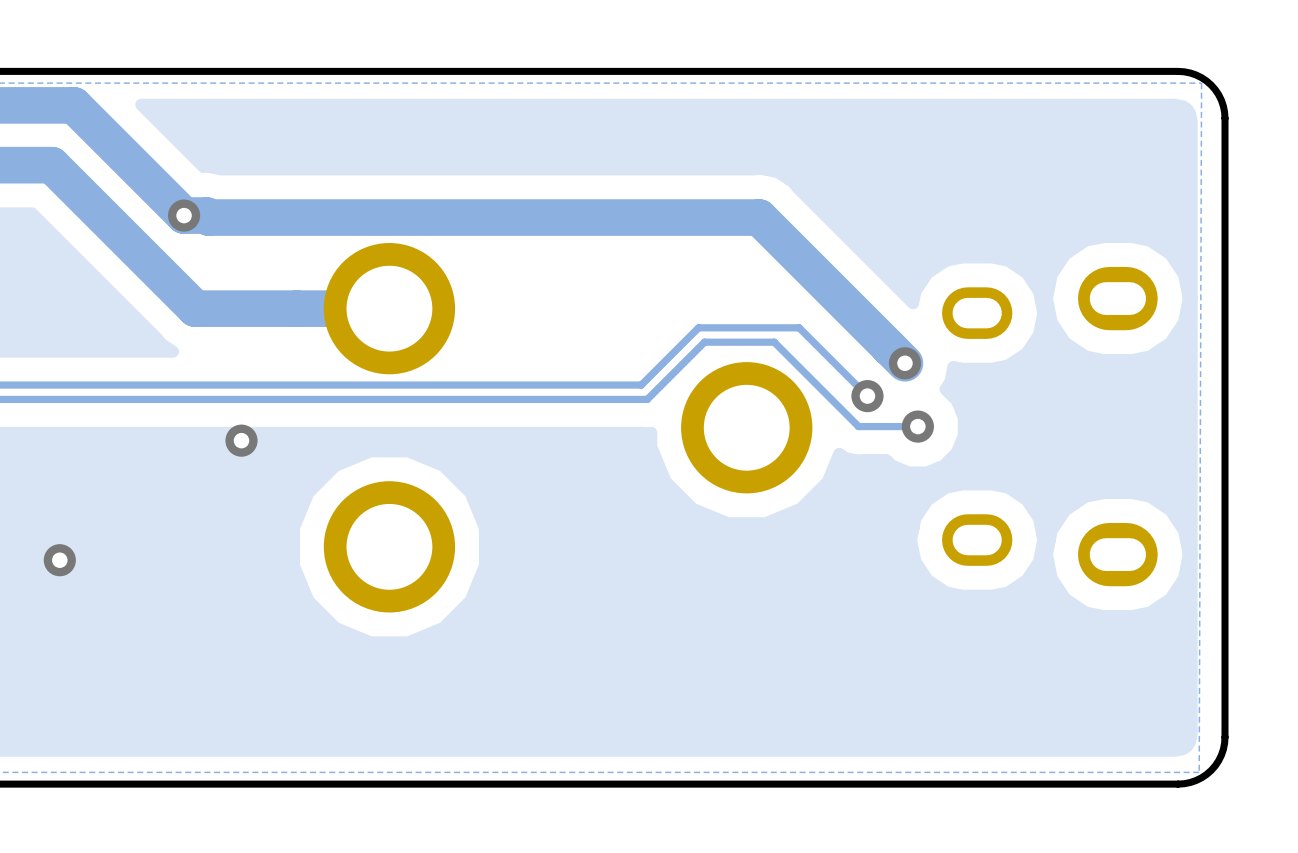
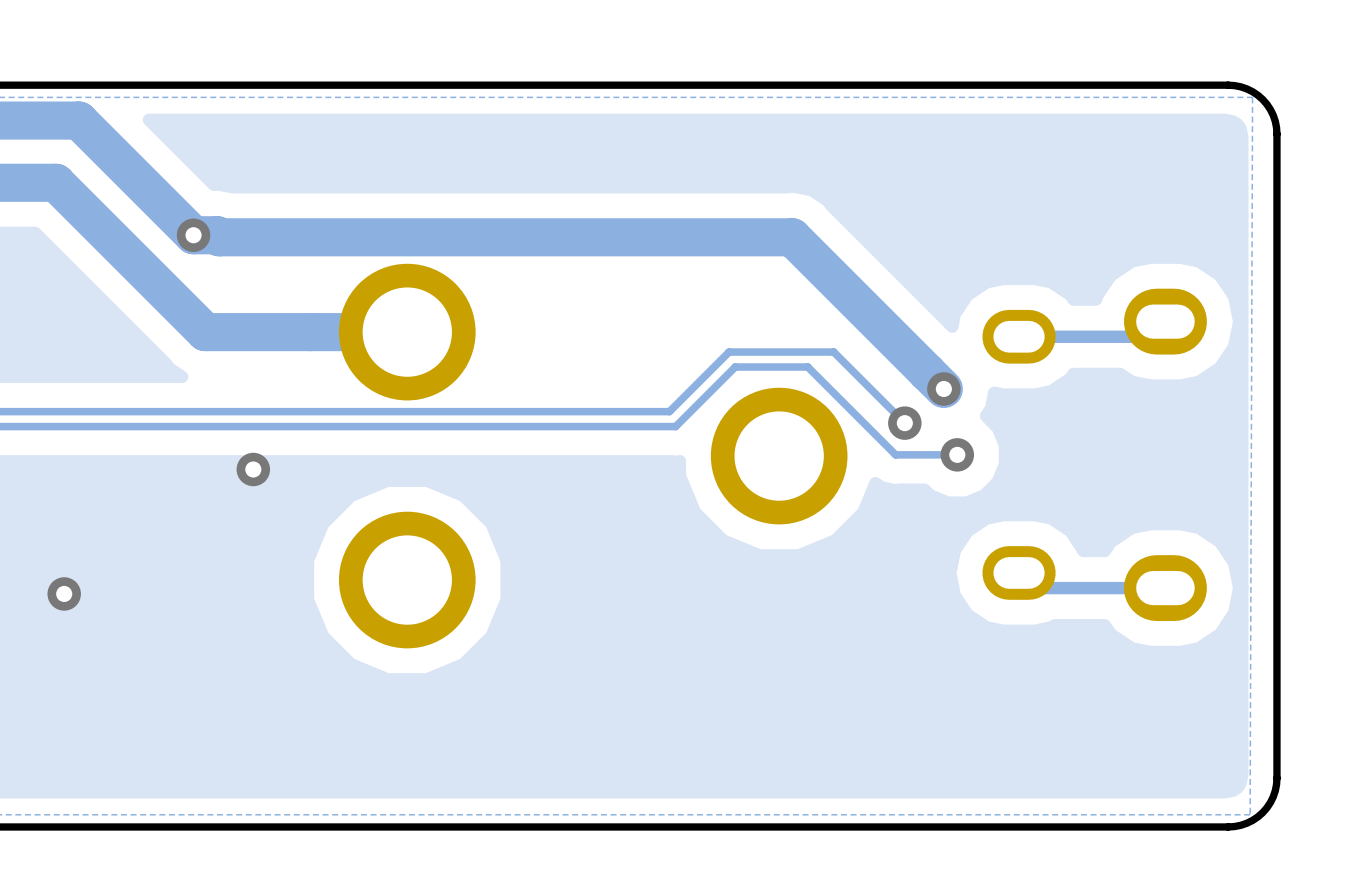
track: none -> (1165, 321) (1150, 336) (1019, 336)
track: none -> (1019, 572) (1034, 588) (1165, 588)

